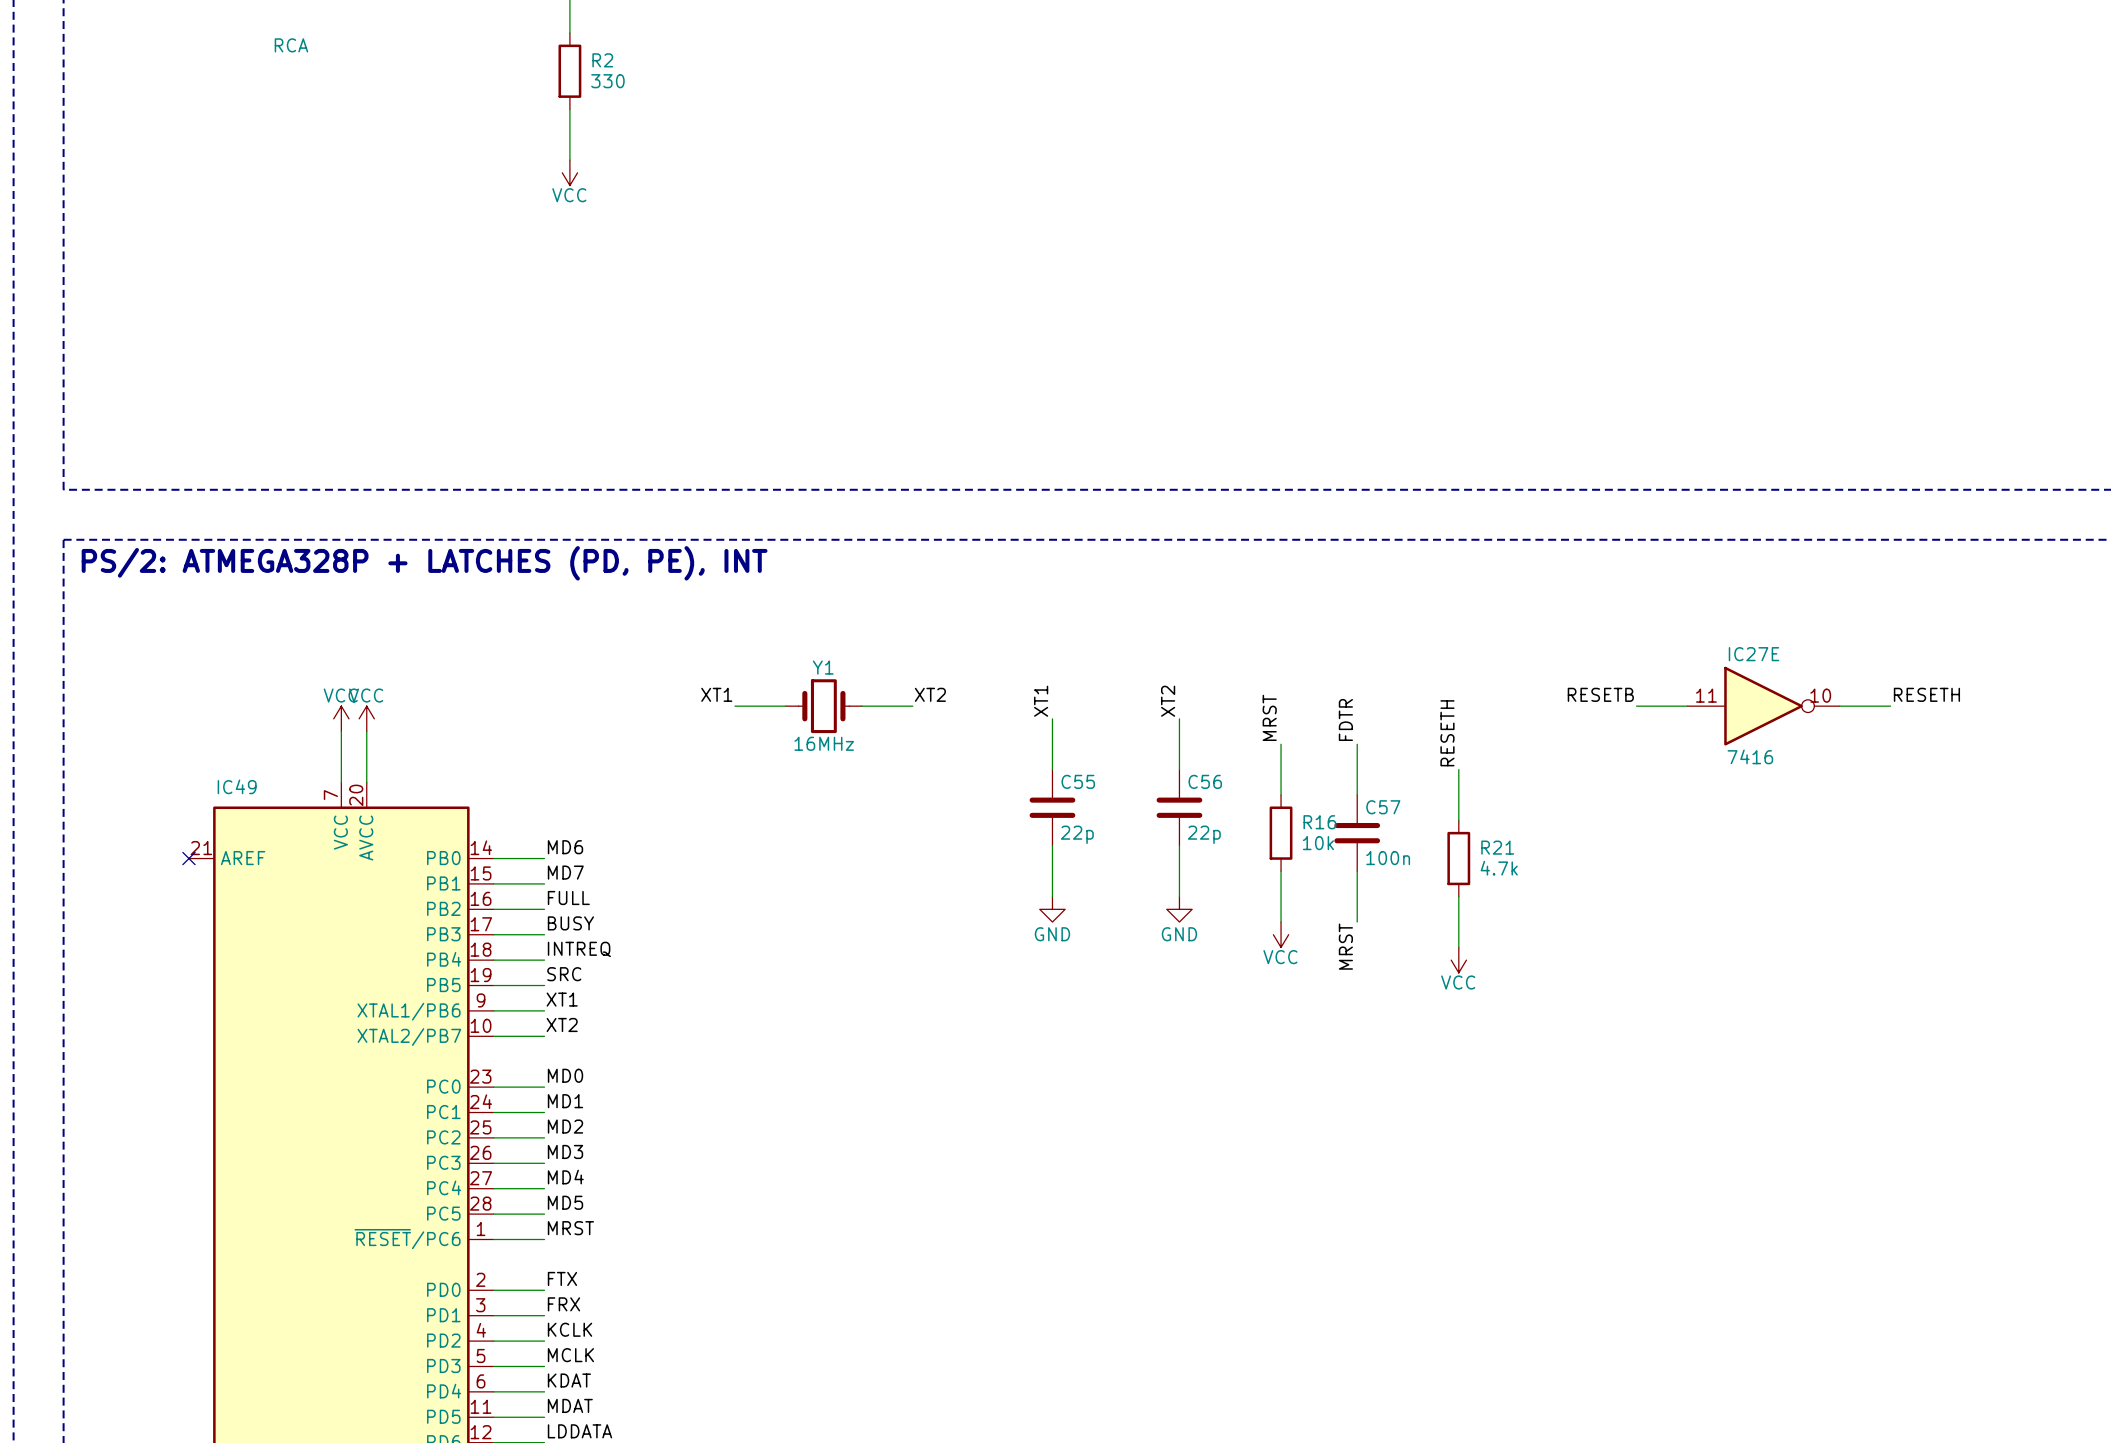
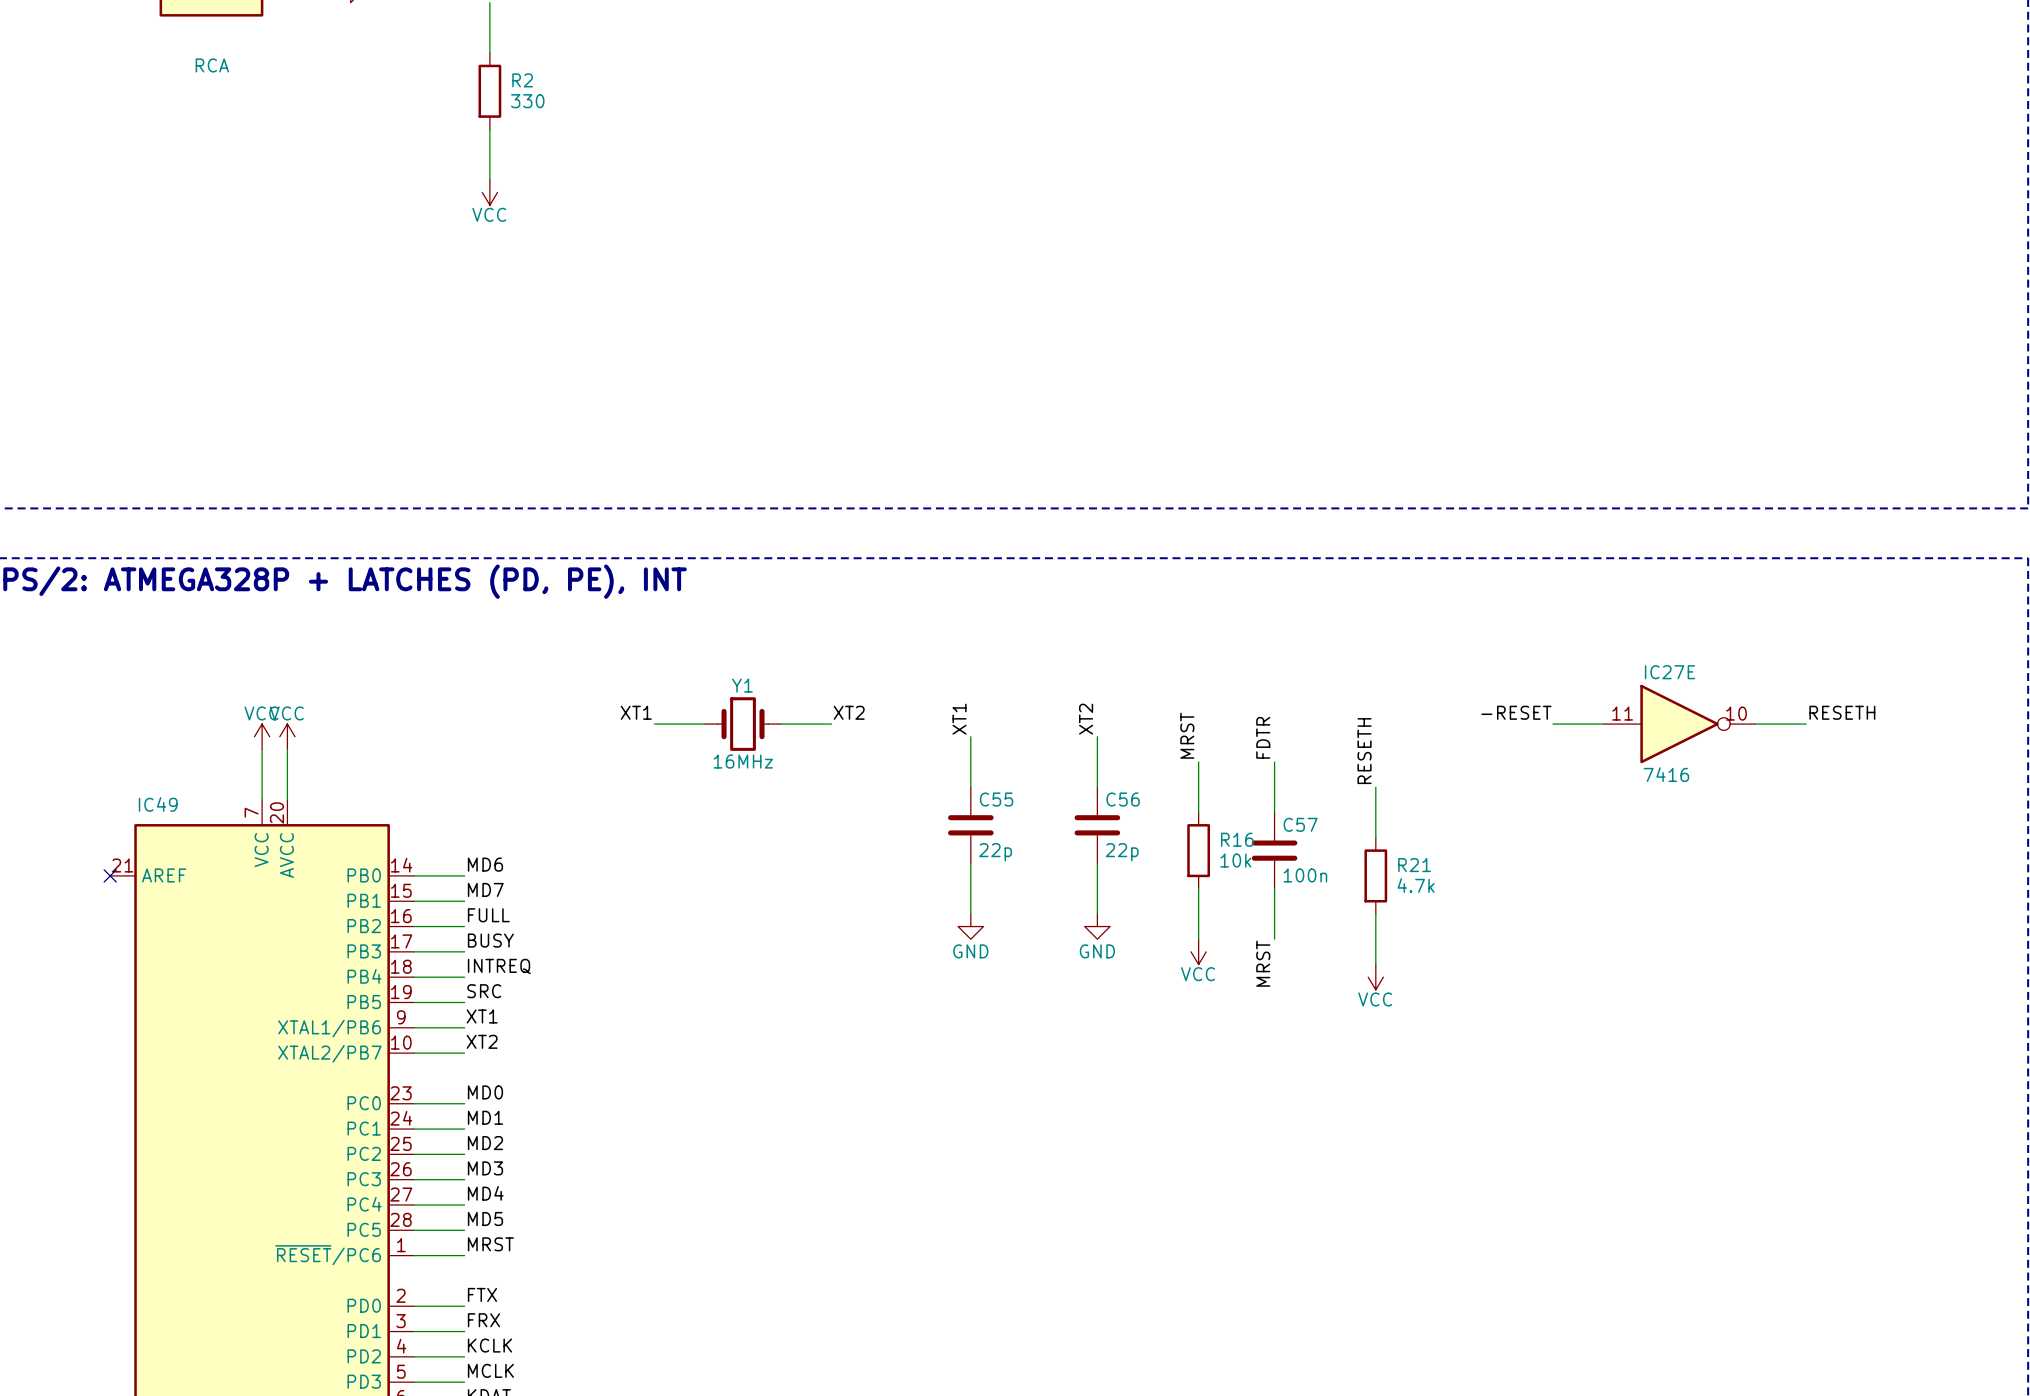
label: RESETB (1600, 694) -> -RESET (1516, 712)

